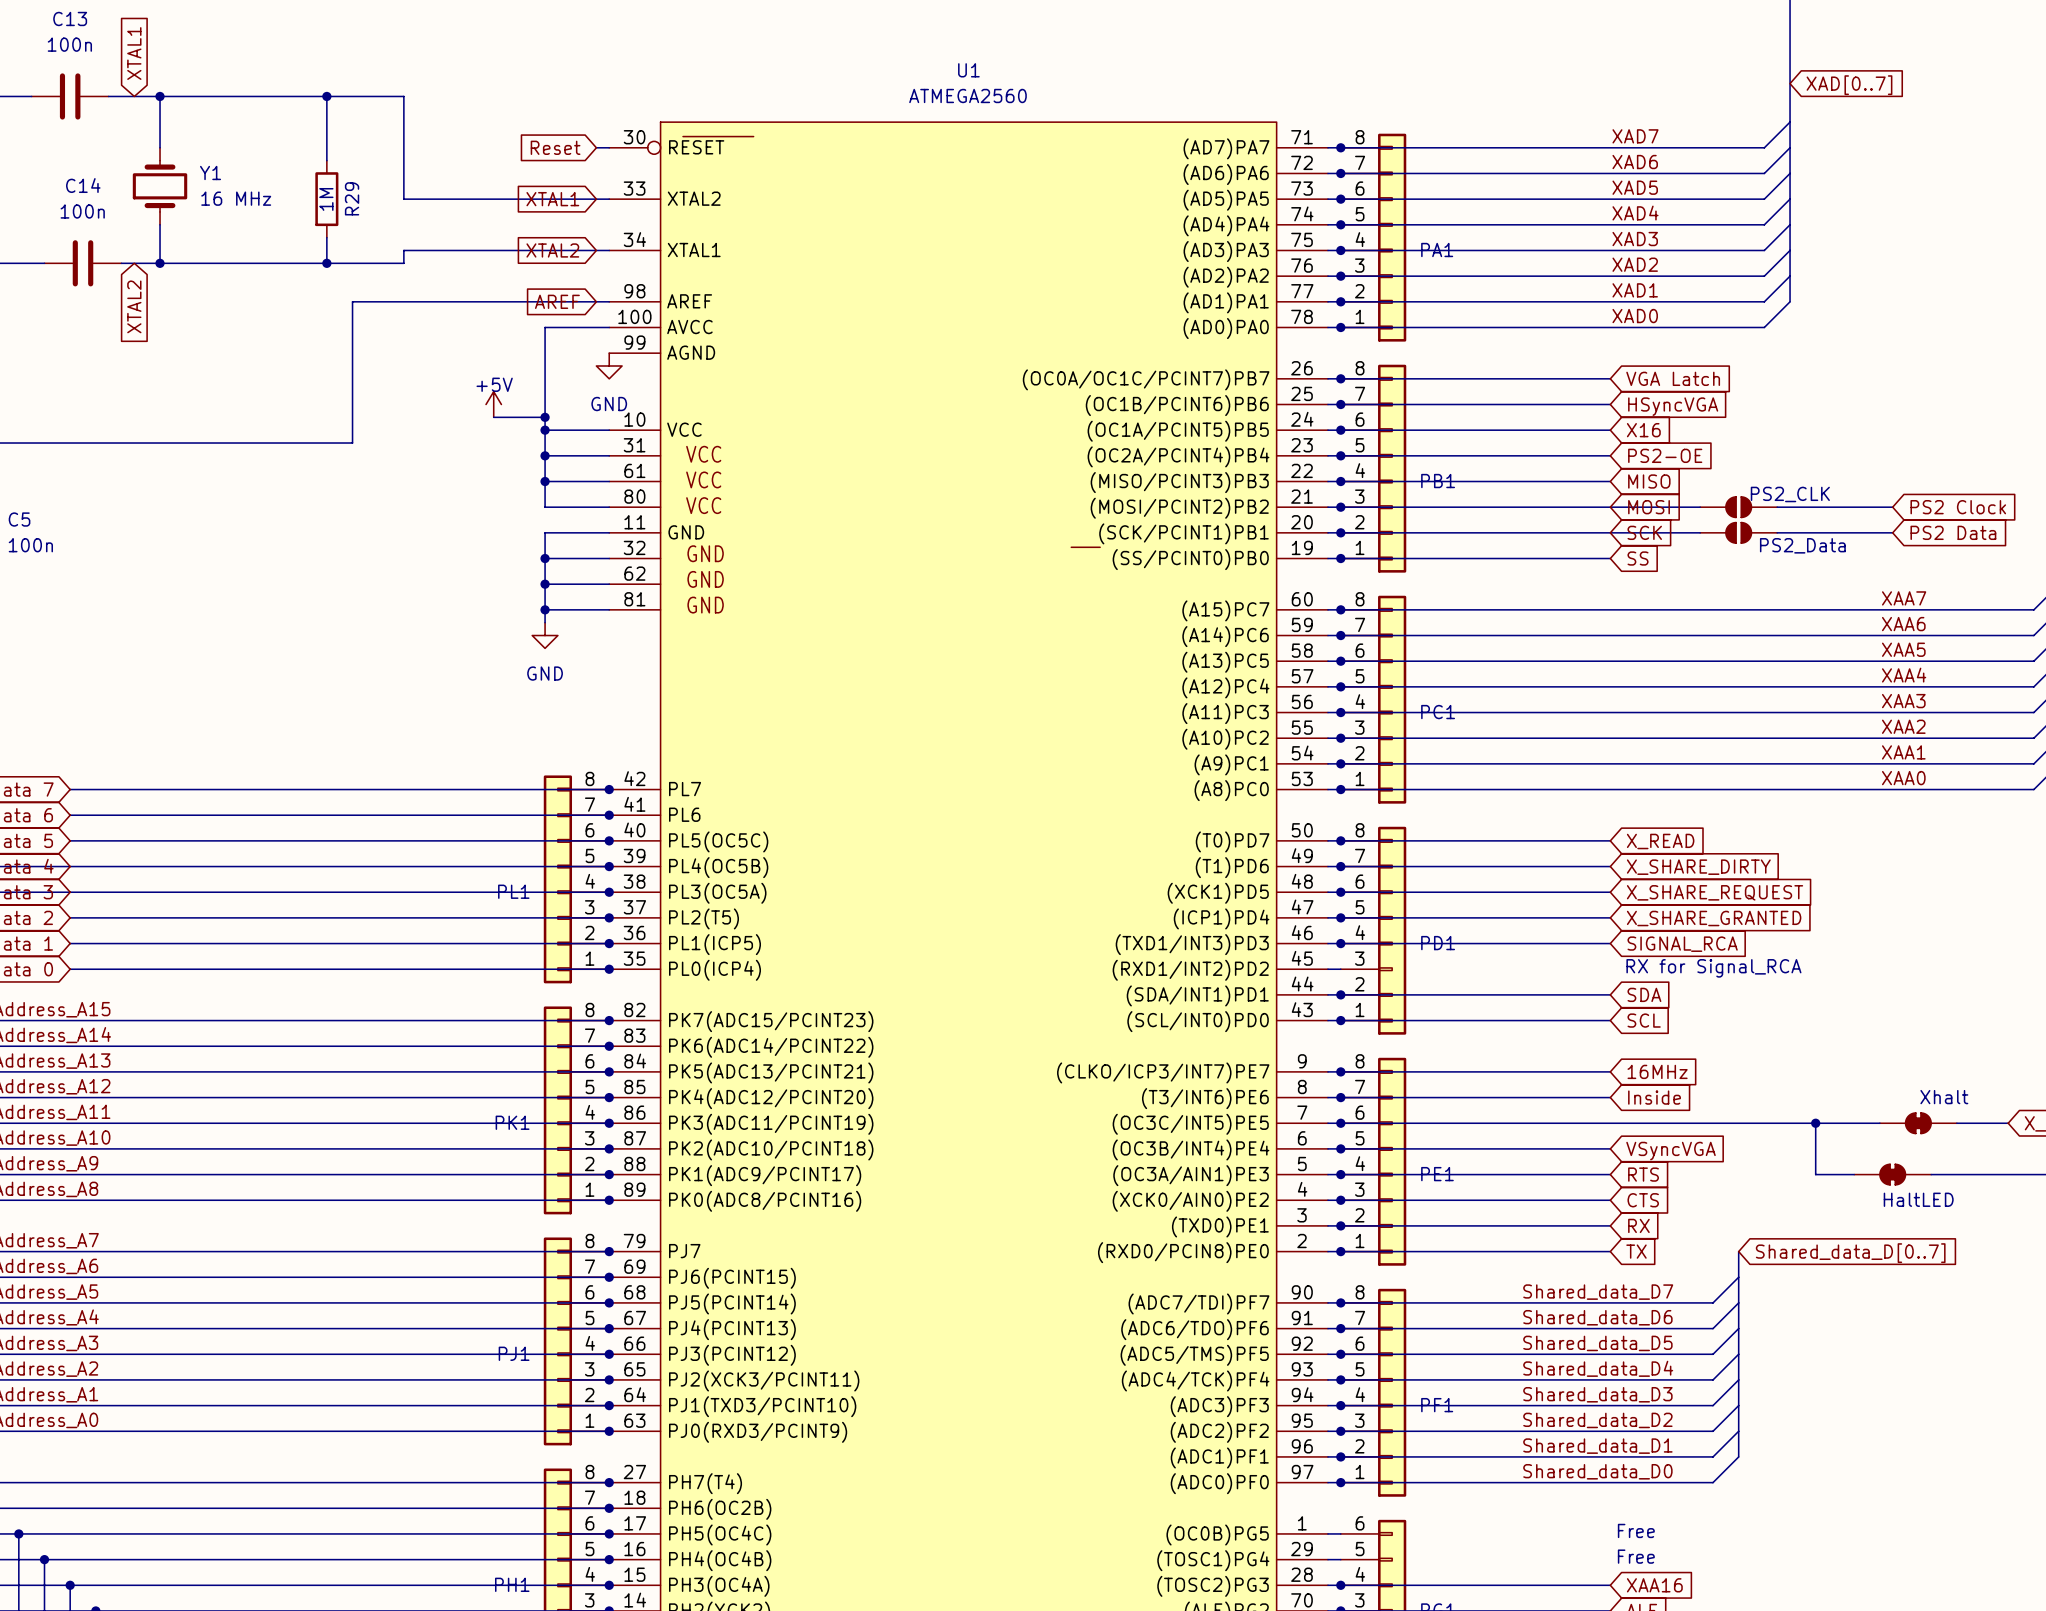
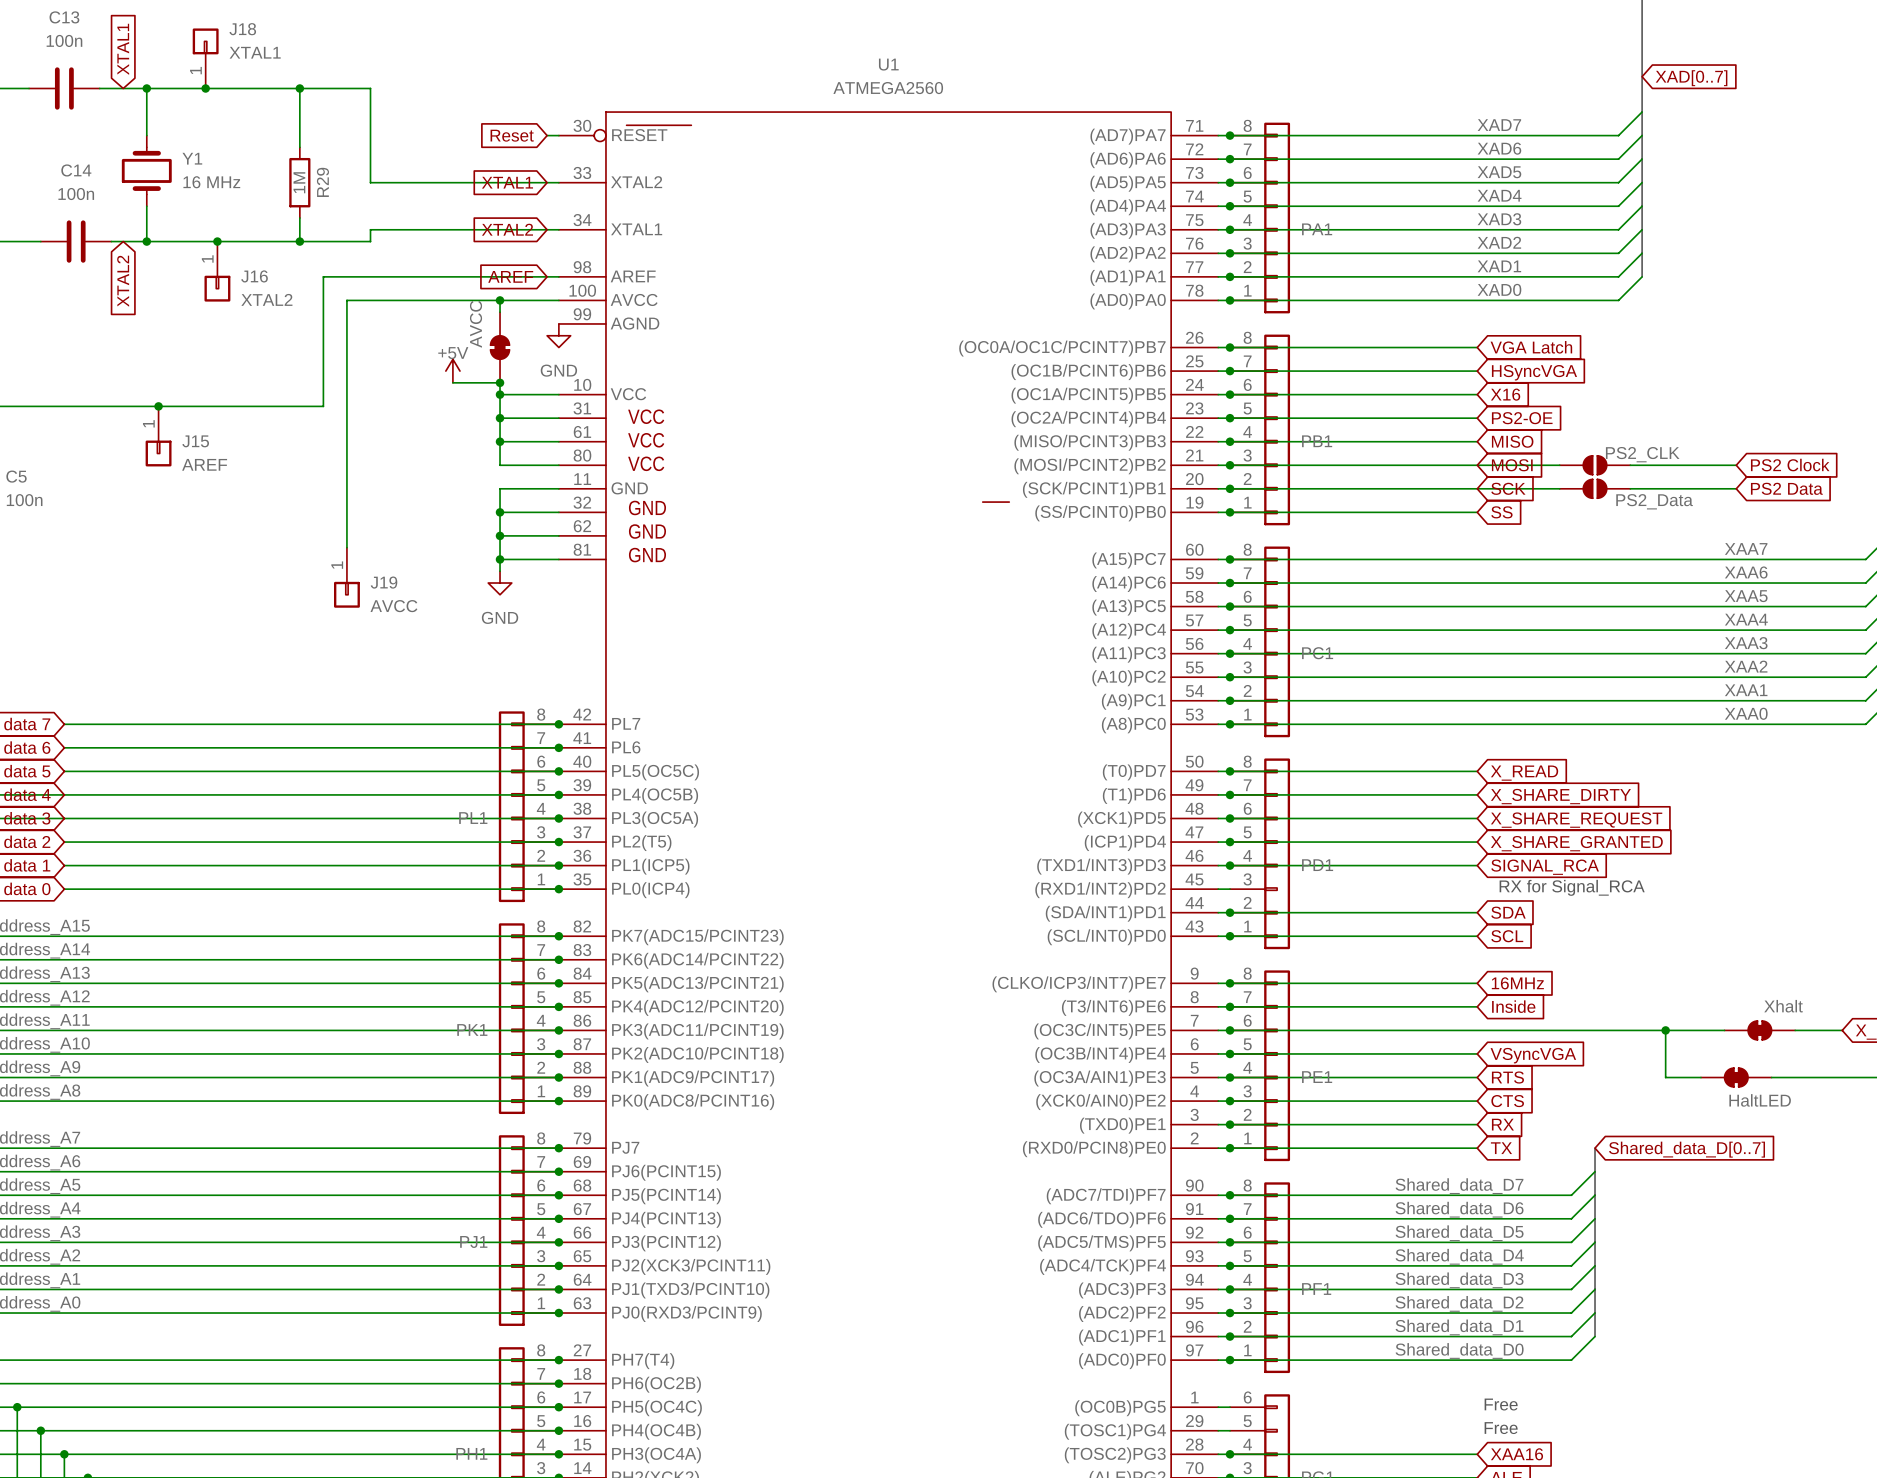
J18: none -> XTAL1 (205, 58)
junction: none -> (205, 88)
junction: none -> (217, 241)
J16: none -> XTAL2 (217, 271)
wire: none -> (500, 300) (346, 300) (346, 547)
junction: none -> (500, 300)
part: none -> AVCC (500, 347)
junction: none -> (158, 406)
J15: none -> AREF (158, 436)
J19: none -> AVCC (346, 577)

